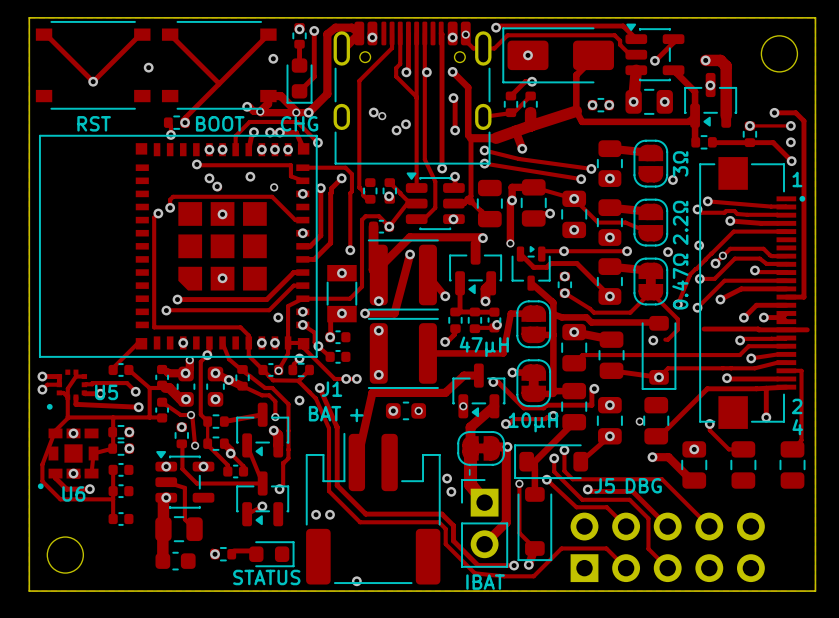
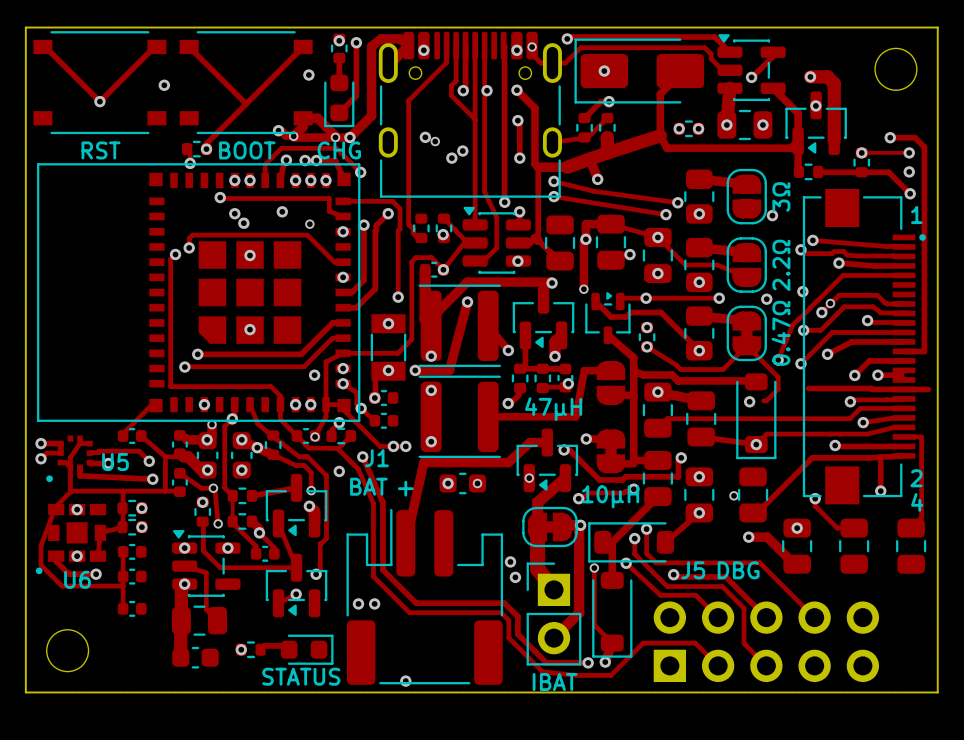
part footprint: [516, 300, 552, 349] -> [596, 361, 626, 405]
part footprint: [516, 359, 552, 408] -> [596, 429, 626, 474]
line: (469, 469) (469, 474) -> none

